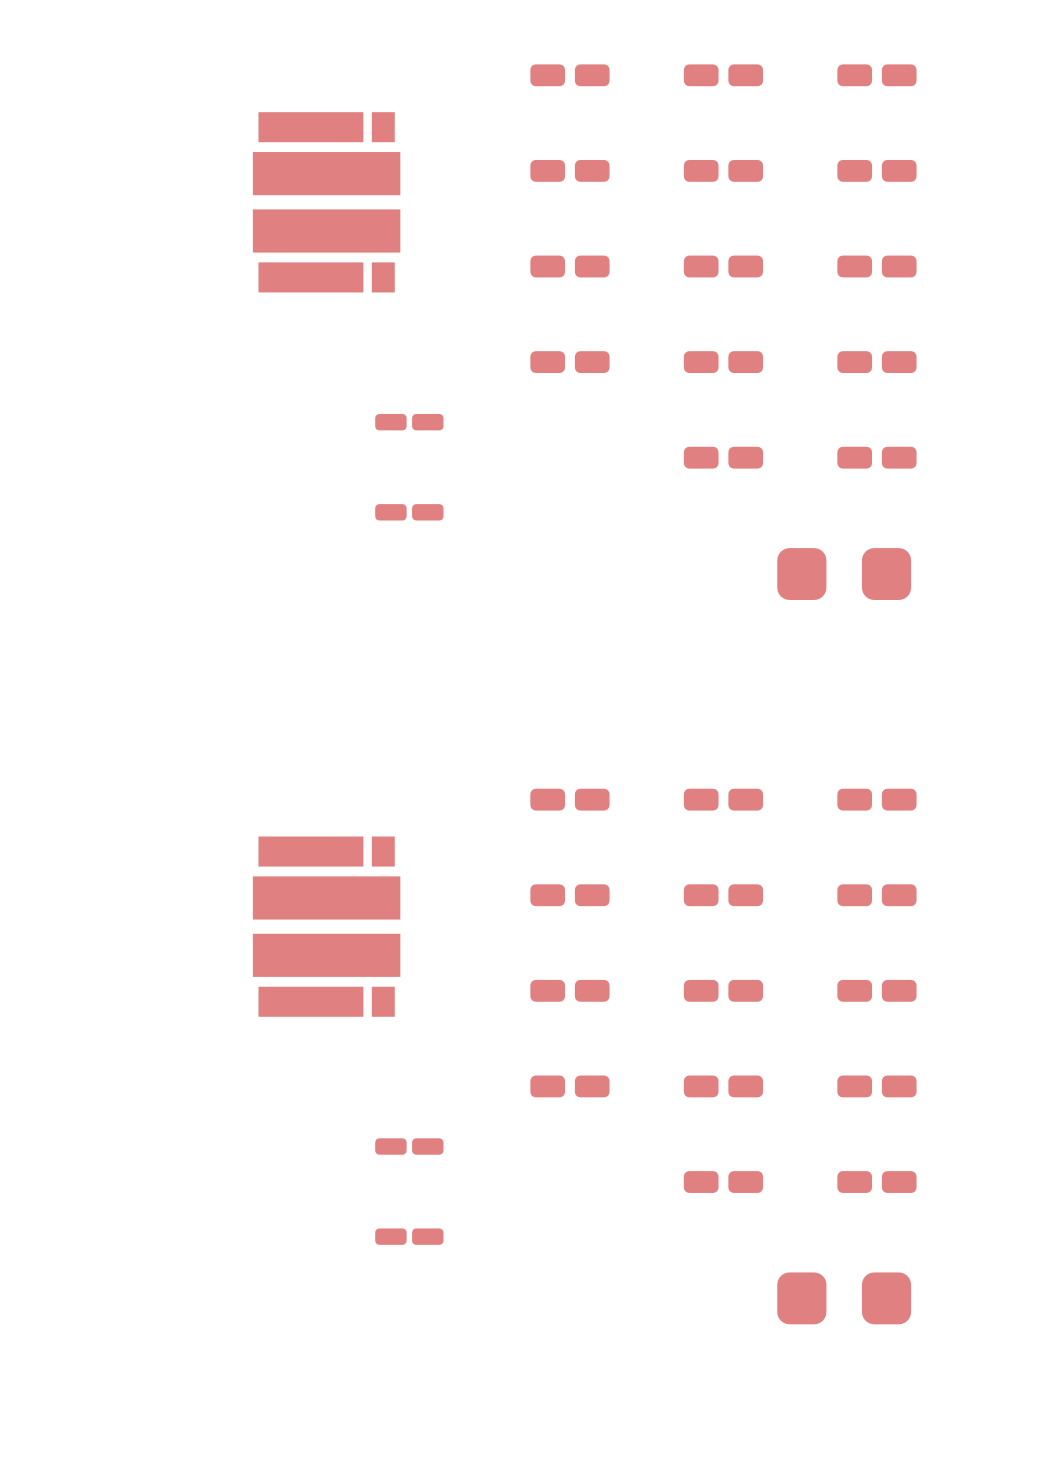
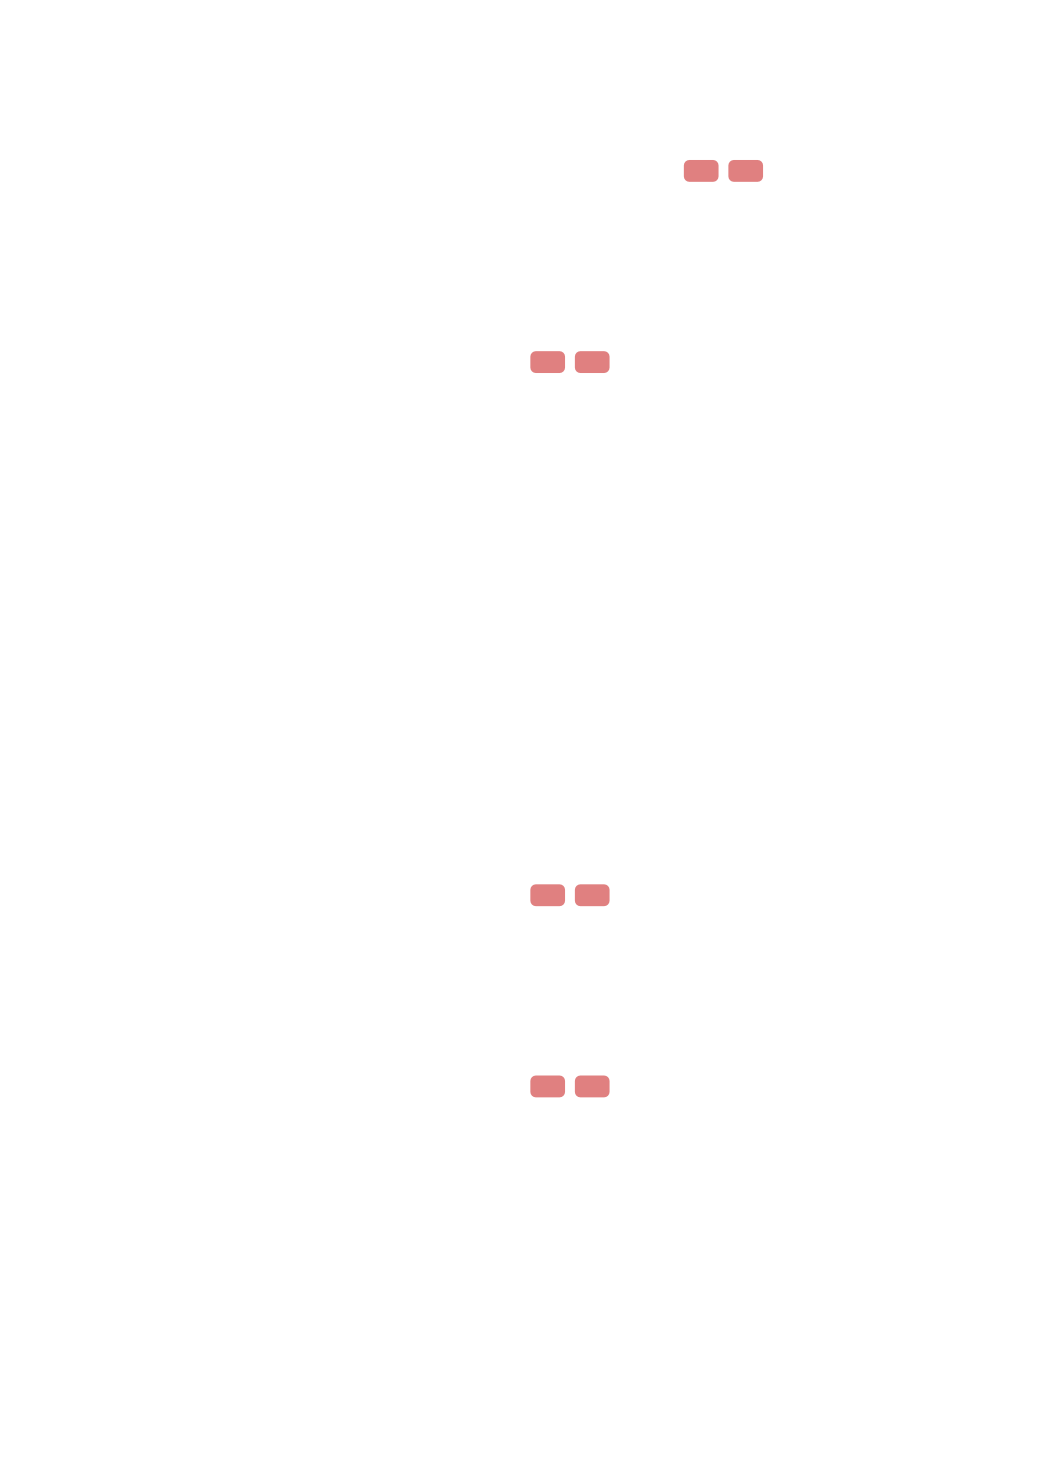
part: (569, 75) -> none
part: (723, 75) -> none
part: (876, 75) -> none
part: (569, 170) -> none
part: (876, 170) -> none
part: (326, 202) -> none
part: (569, 266) -> none
part: (723, 266) -> none
part: (876, 266) -> none
part: (723, 362) -> none
part: (876, 362) -> none
part: (409, 422) -> none
part: (723, 457) -> none
part: (876, 457) -> none
part: (409, 512) -> none
part: (844, 574) -> none
part: (569, 799) -> none
part: (723, 799) -> none
part: (876, 799) -> none
part: (723, 895) -> none
part: (876, 895) -> none
part: (326, 926) -> none
part: (569, 990) -> none
part: (723, 990) -> none
part: (876, 990) -> none
part: (723, 1086) -> none
part: (876, 1086) -> none
part: (409, 1146) -> none
part: (723, 1182) -> none
part: (876, 1182) -> none
part: (409, 1236) -> none
part: (844, 1298) -> none

